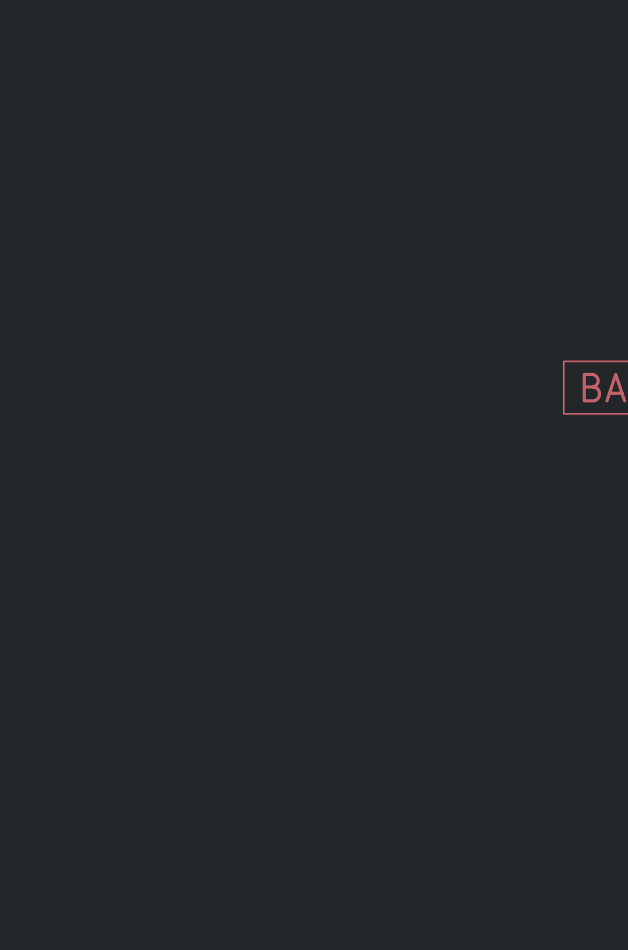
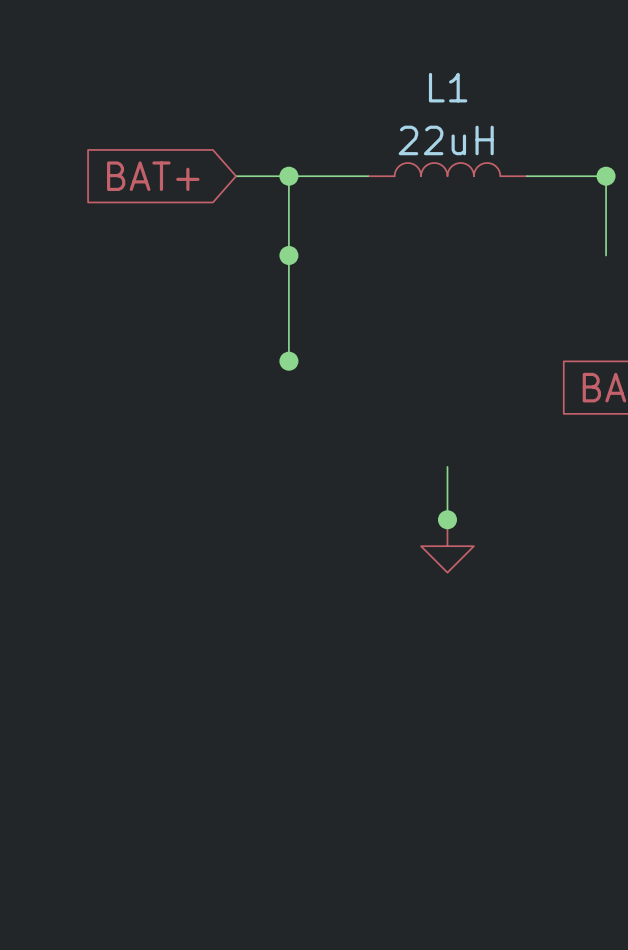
L1: none -> 22uH (447, 169)
global label: none -> BAT+ (153, 176)
wire: none -> (236, 176) (368, 176)
wire: none -> (288, 176) (288, 361)
junction: none -> (288, 176)
wire: none -> (526, 176) (606, 176) (606, 255)
junction: none -> (606, 176)
junction: none -> (288, 255)
junction: none -> (288, 361)
wire: none -> (447, 466) (447, 519)
junction: none -> (447, 519)
power symbol: none -> (447, 546)

